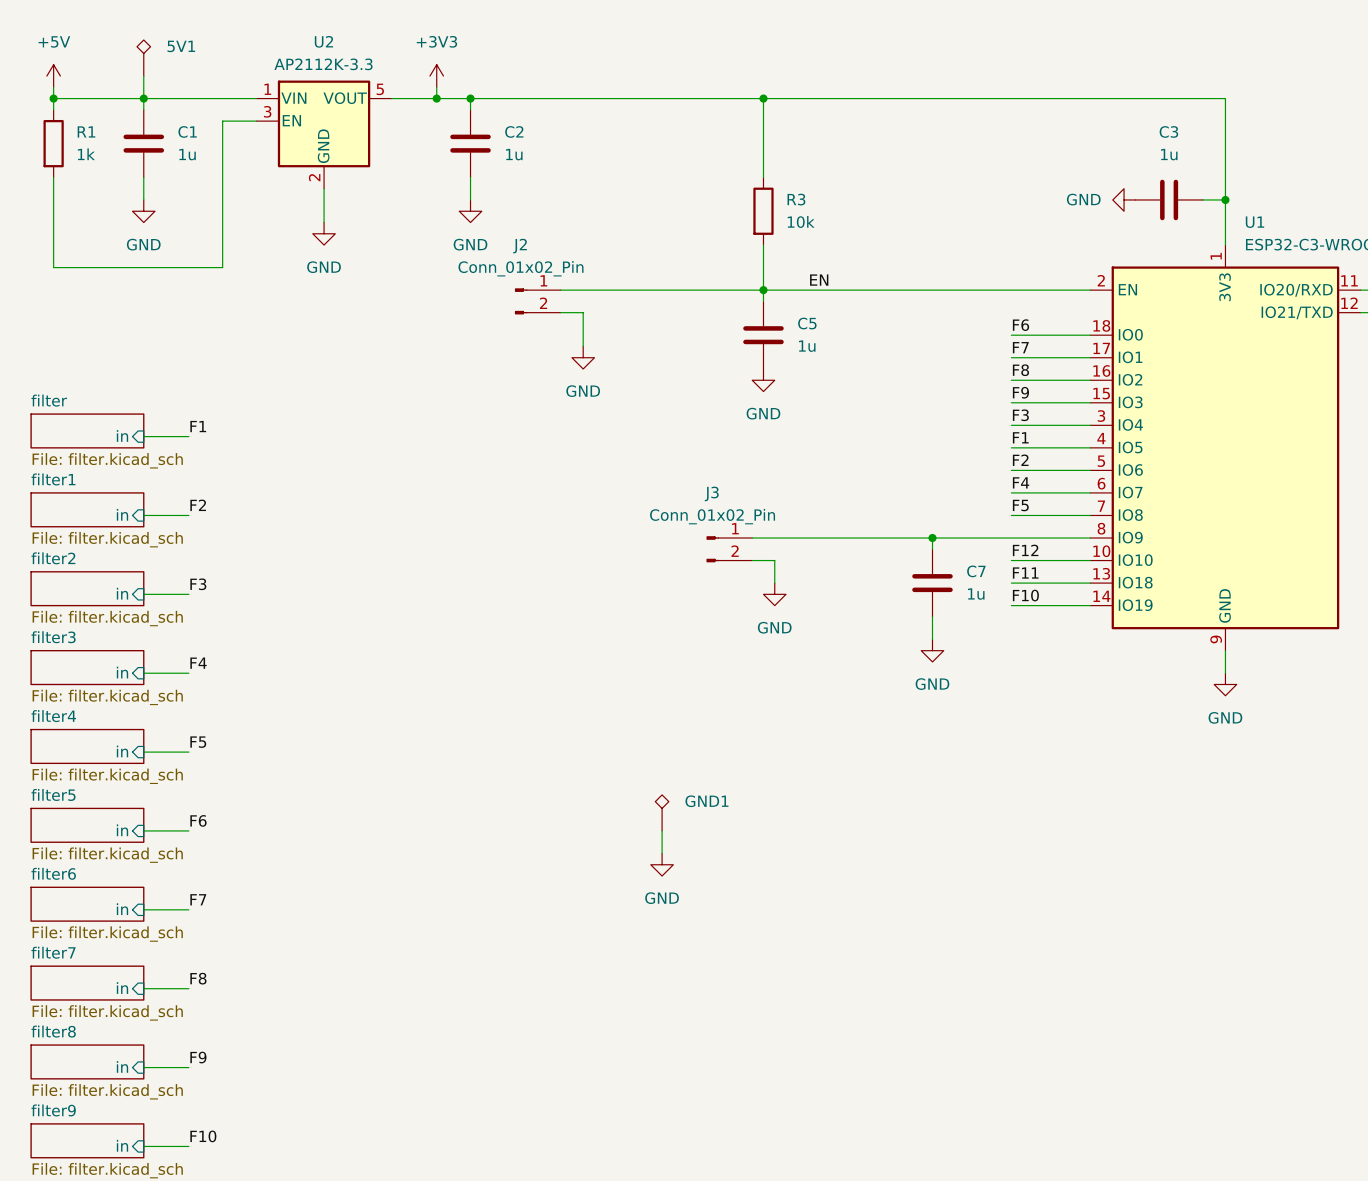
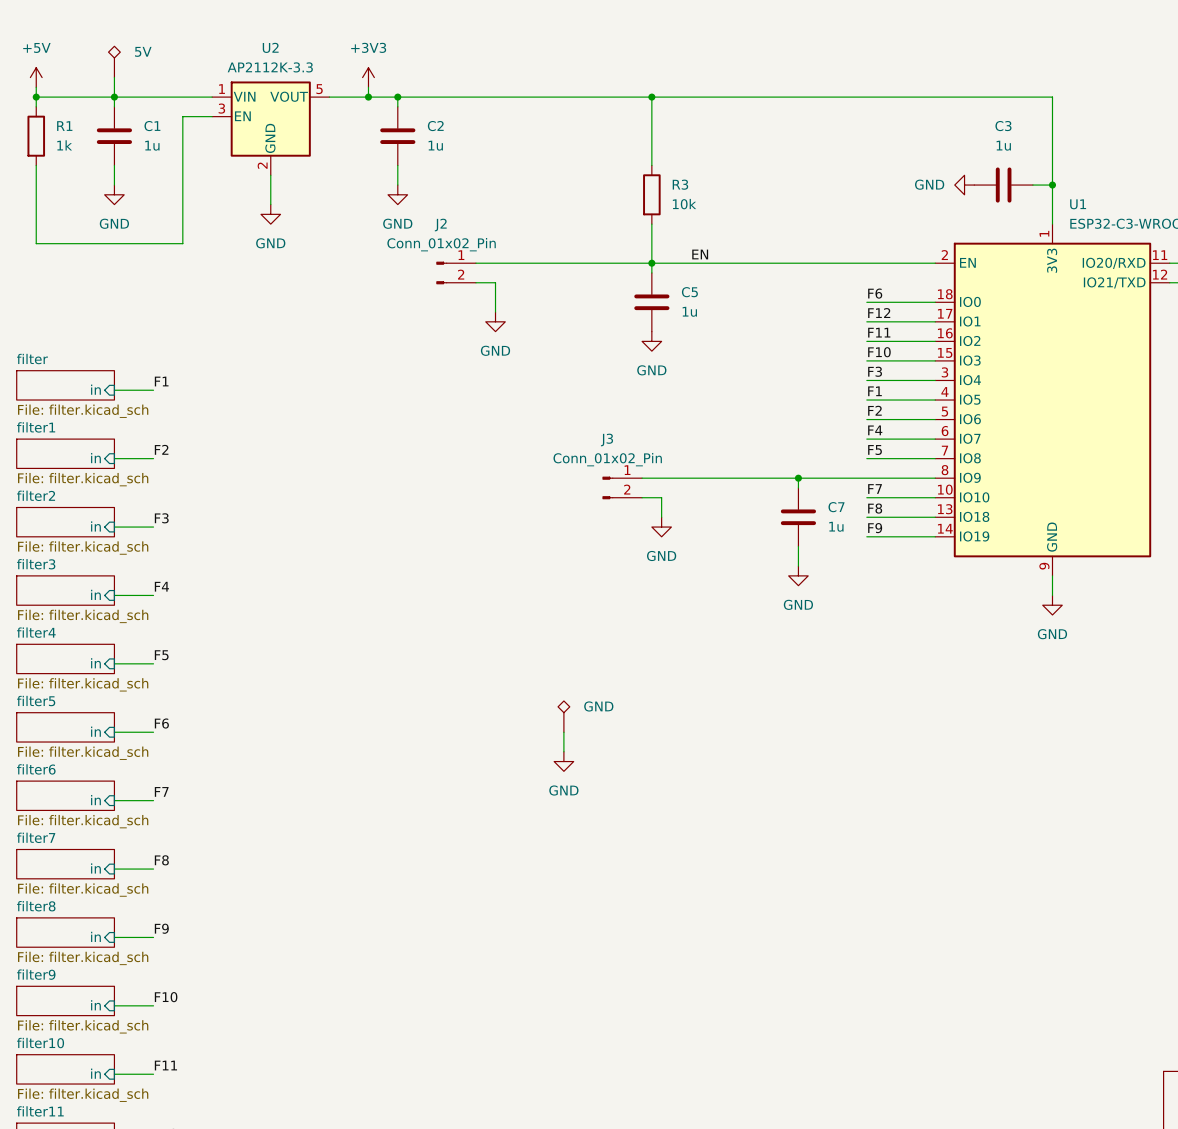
5V1 name: 5V1 (181, 46) -> 5V (143, 51)
label: F7 (1020, 347) -> F12 (879, 313)
label: F8 (1020, 370) -> F11 (879, 332)
label: F9 (1020, 392) -> F10 (879, 352)
label: F12 (1025, 550) -> F7 (875, 489)
label: F11 (1025, 573) -> F8 (875, 508)
label: F10 (1025, 595) -> F9 (875, 528)
GND1 name: GND1 (706, 801) -> GND (598, 706)

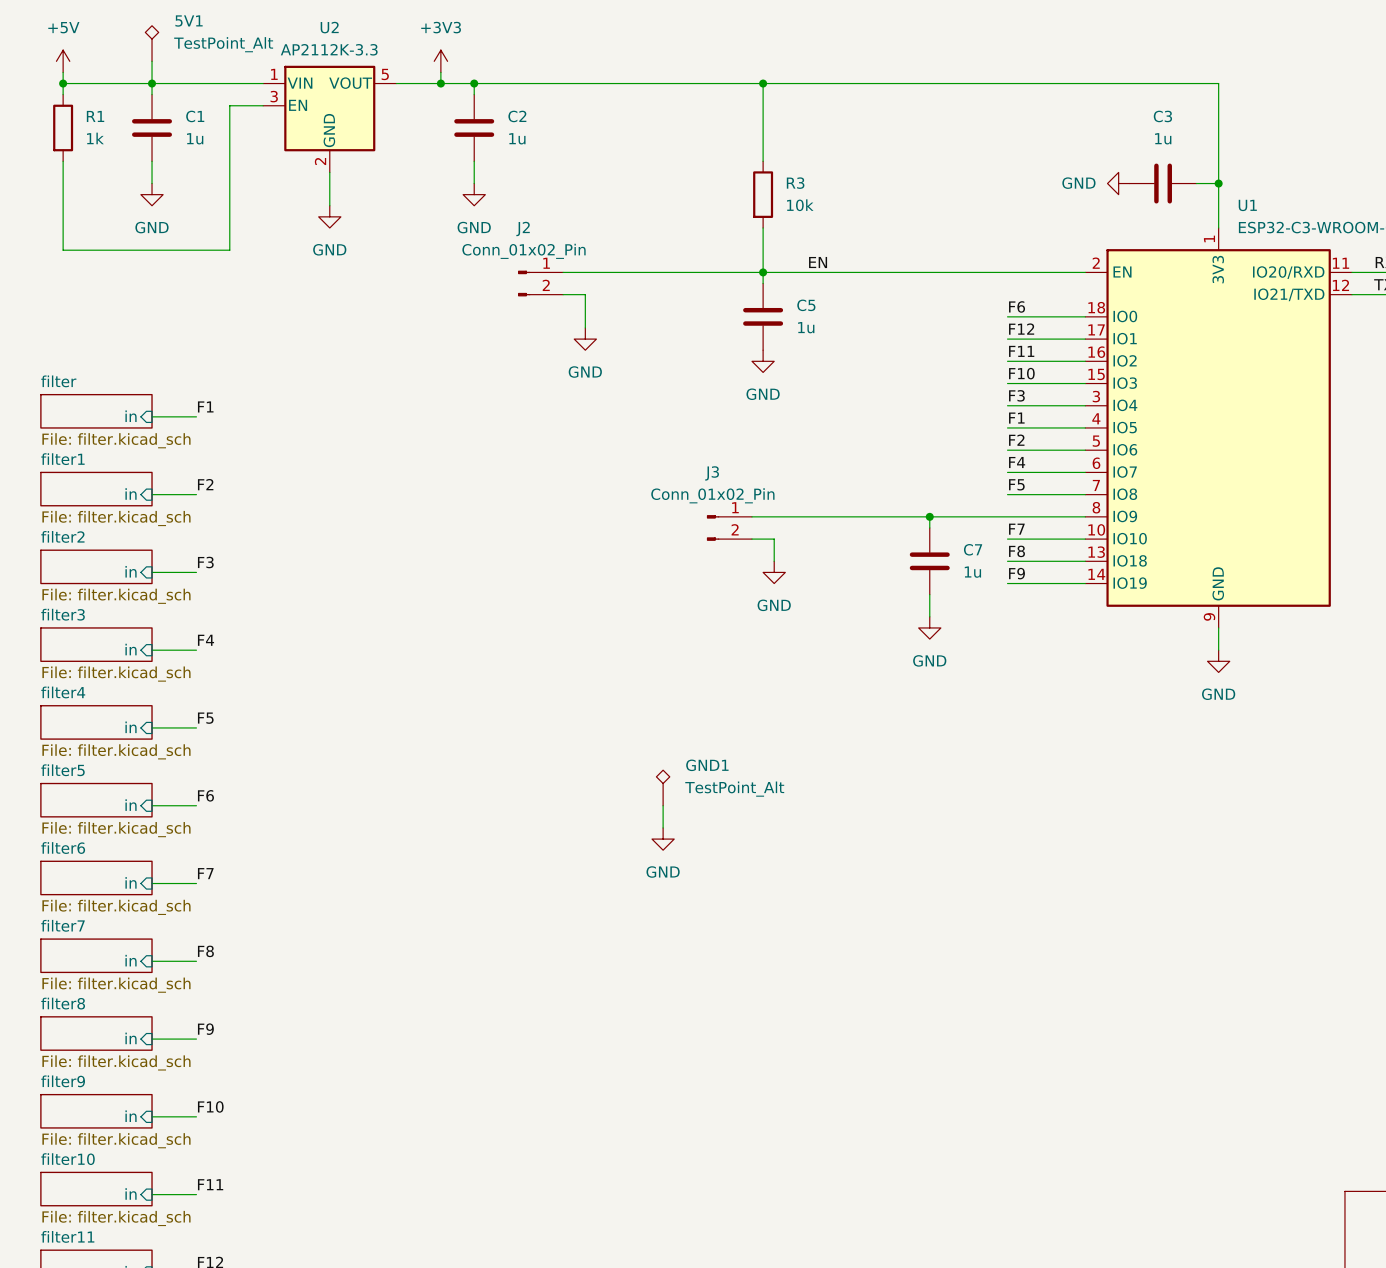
5V name: 5V (143, 51) -> 5V1 (189, 21)
5V value: none -> TestPoint_Alt (223, 44)
GND name: GND (598, 706) -> GND1 (707, 765)
GND value: none -> TestPoint_Alt (734, 789)

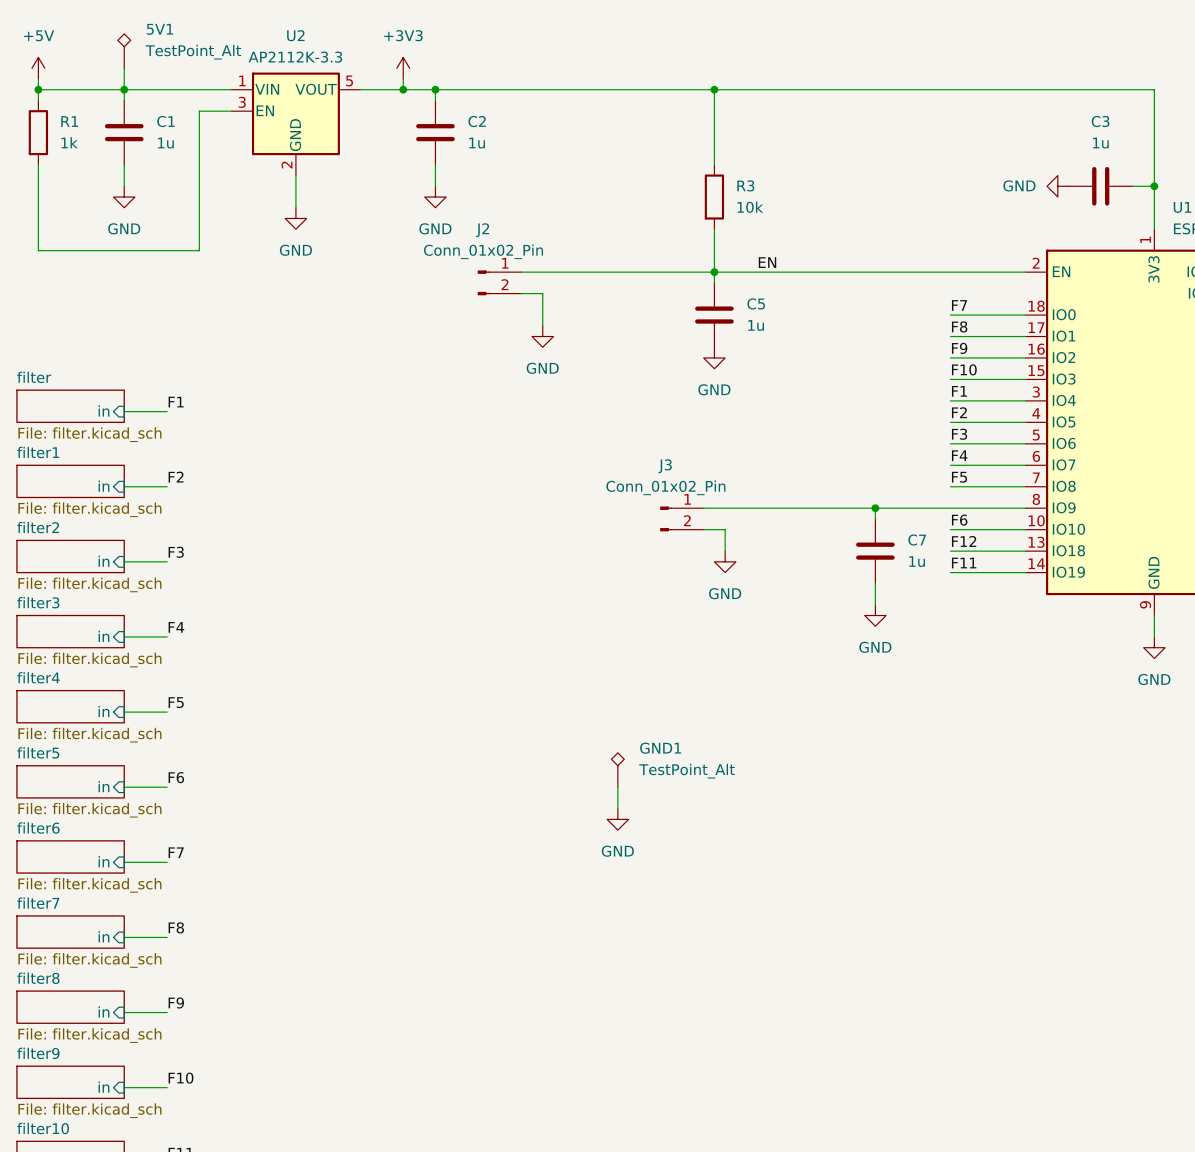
label: F6 (1017, 306) -> F7 (959, 305)
label: F12 (1021, 329) -> F8 (959, 326)
label: F11 (1021, 351) -> F9 (959, 348)
label: F3 (1016, 395) -> F1 (959, 391)
label: F1 (1016, 418) -> F2 (959, 412)
label: F2 (1016, 440) -> F3 (959, 434)
label: F7 (1016, 529) -> F6 (959, 520)
label: F8 (1017, 551) -> F12 (964, 541)
label: F9 (1016, 573) -> F11 (964, 563)

